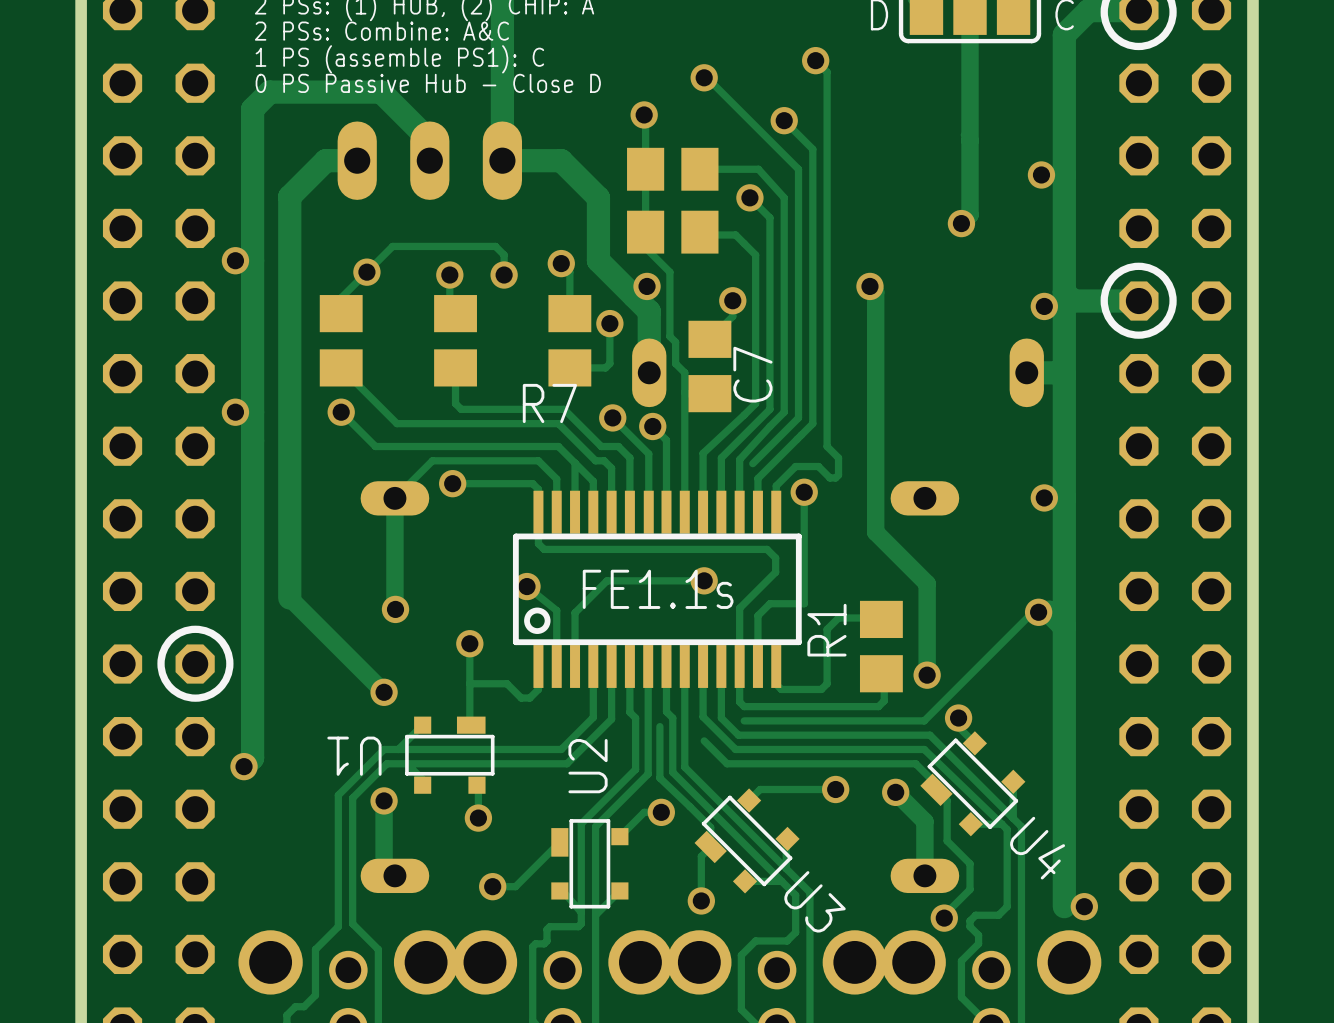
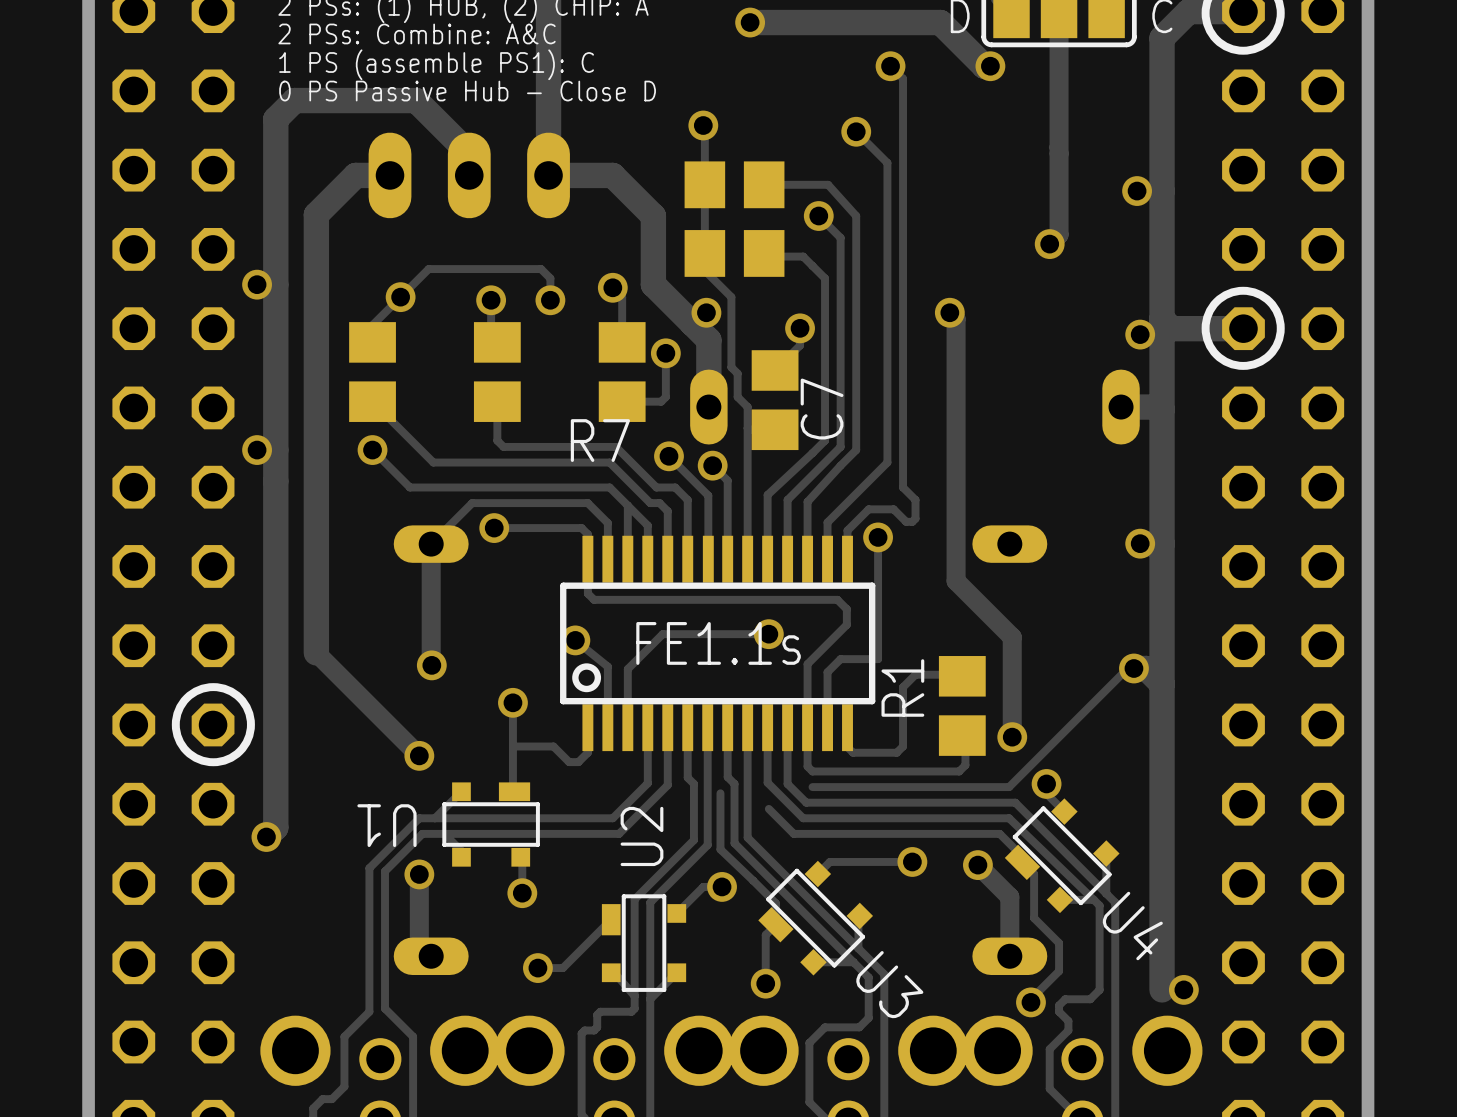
track: none -> (750, 22) (940, 22) (984, 66) (990, 66)
via: none -> (990, 66)
track: (704, 77) (707, 77) (798, 169) (798, 417) (752, 463) -> none
via position: (704, 77) -> (750, 22)

